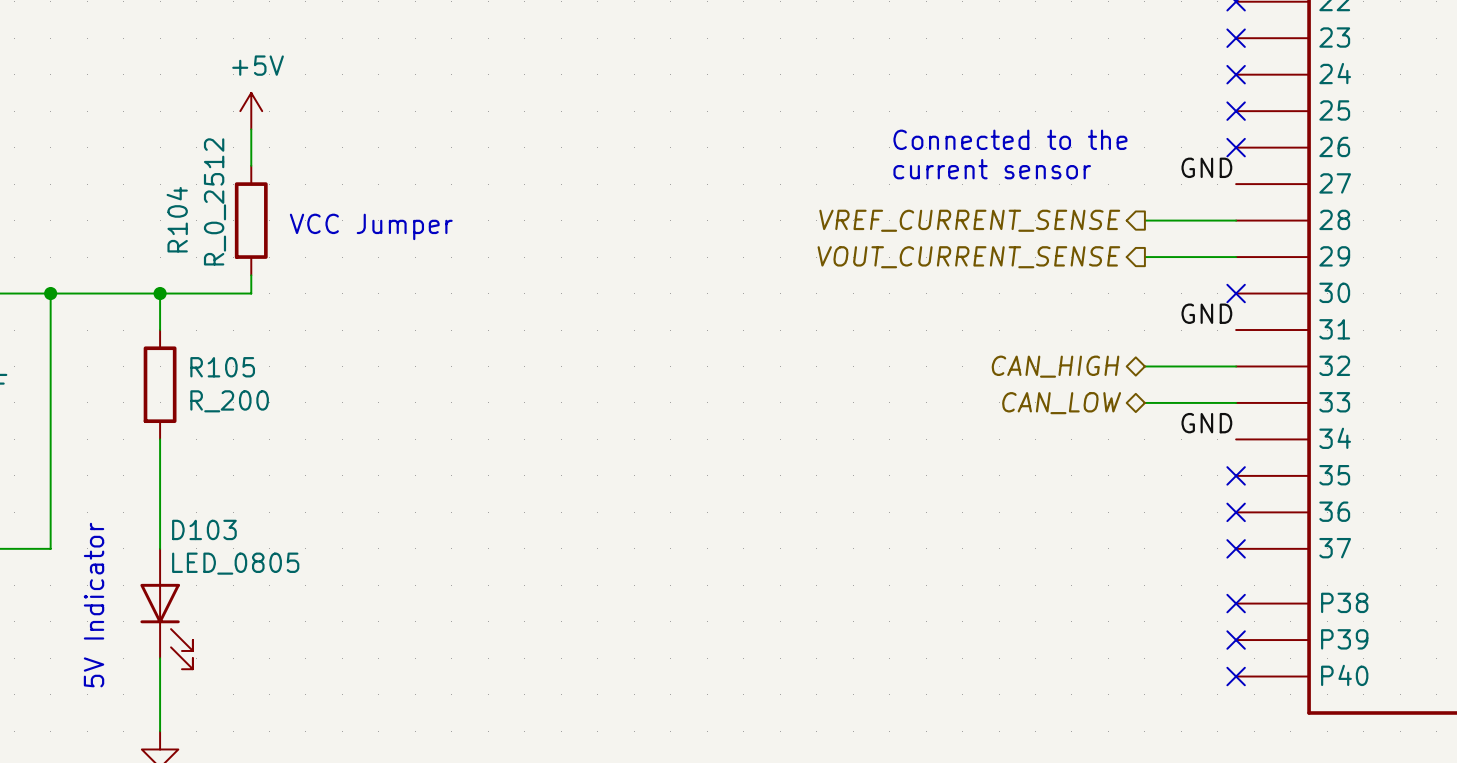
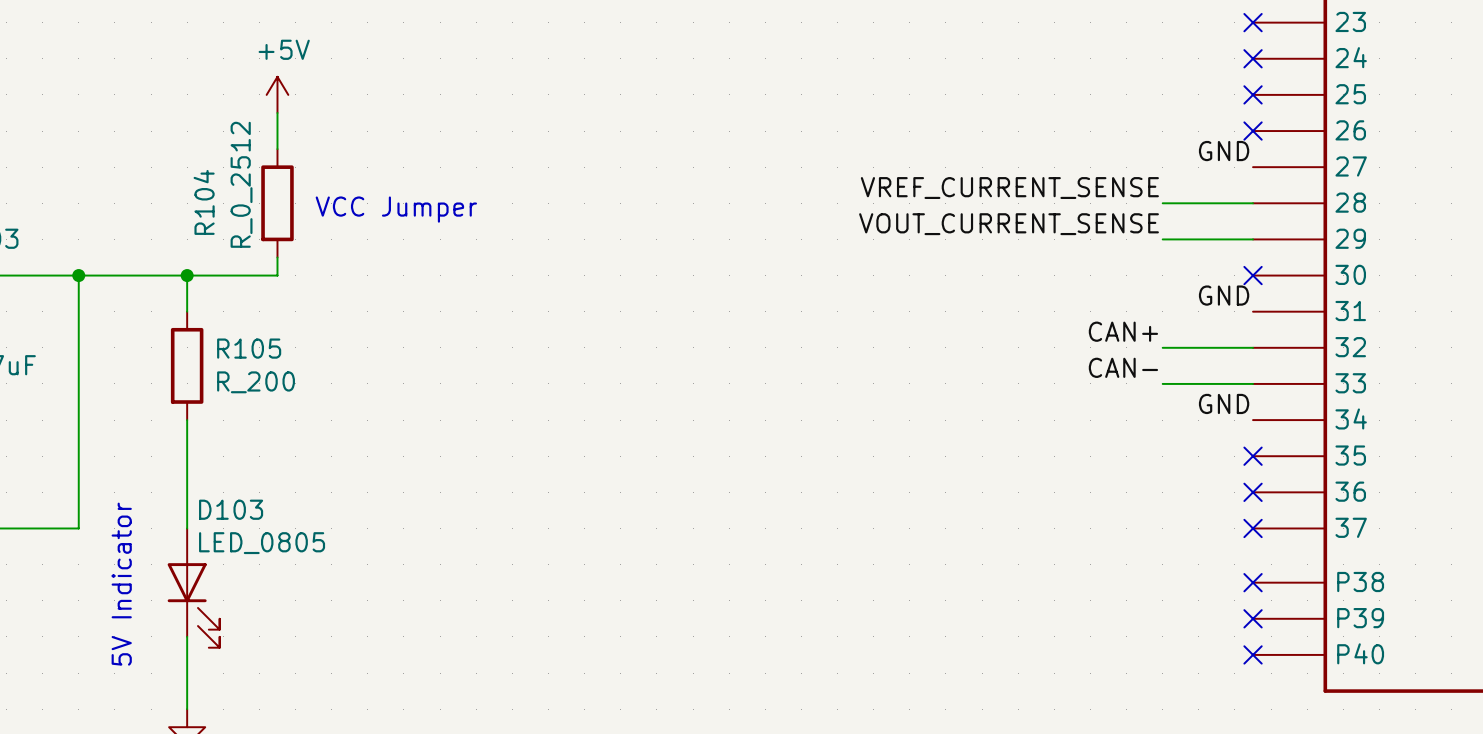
text: Connected to the (1010, 139) -> none
text: current sensor (992, 169) -> none
label: none -> VREF_CURRENT_SENSE (1009, 188)
hierarchical label: VREF_CURRENT_SENSE (969, 220) -> none
label: none -> VOUT_CURRENT_SENSE (1009, 224)
hierarchical label: VOUT_CURRENT_SENSE (968, 257) -> none
label: none -> CAN+ (1123, 331)
hierarchical label: CAN_HIGH (1055, 366) -> none
label: none -> CAN- (1123, 367)
hierarchical label: CAN_LOW (1061, 403) -> none

